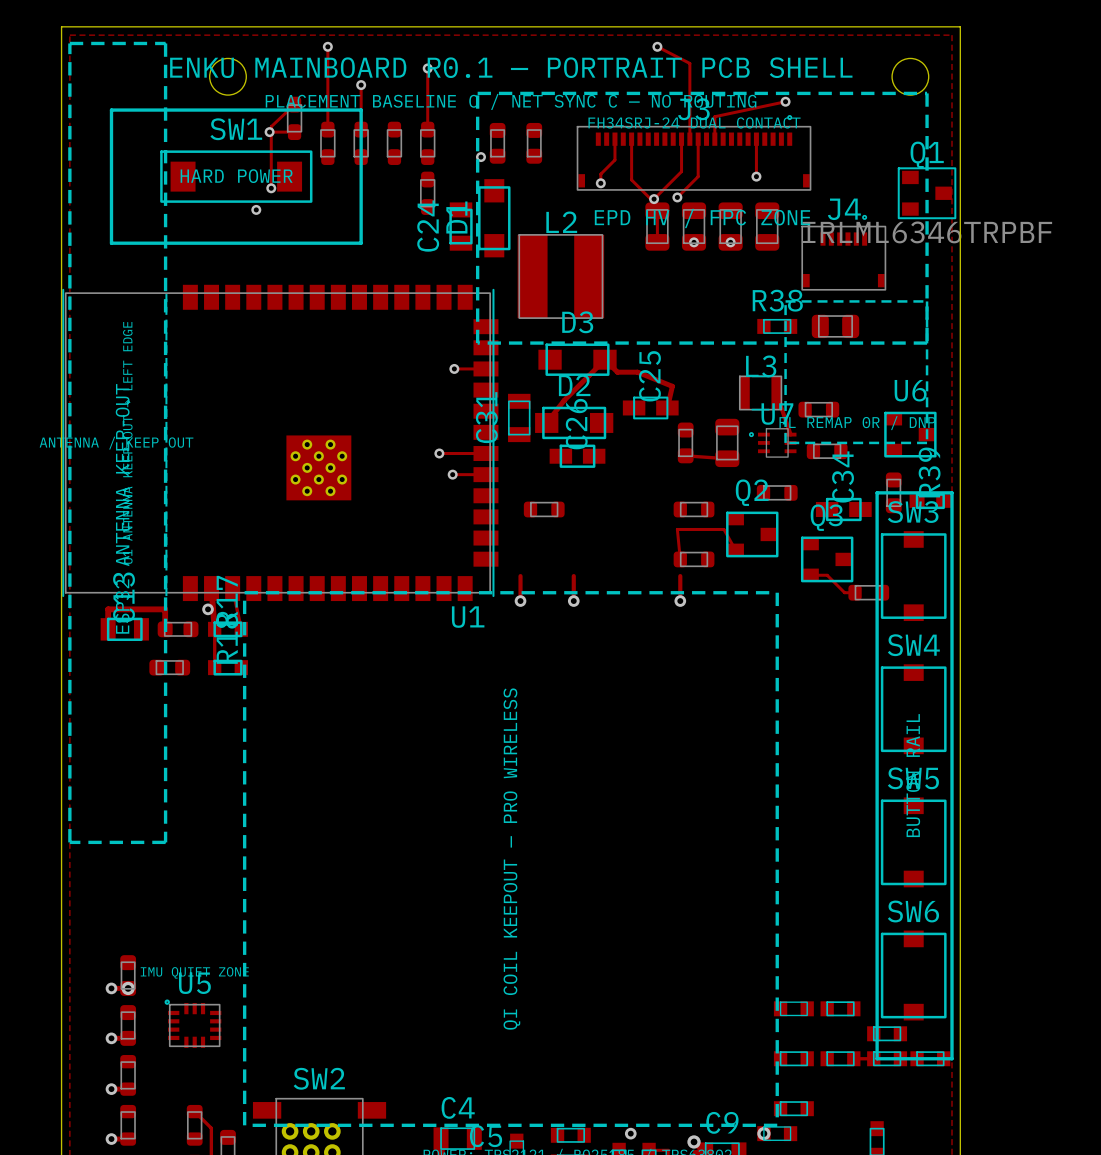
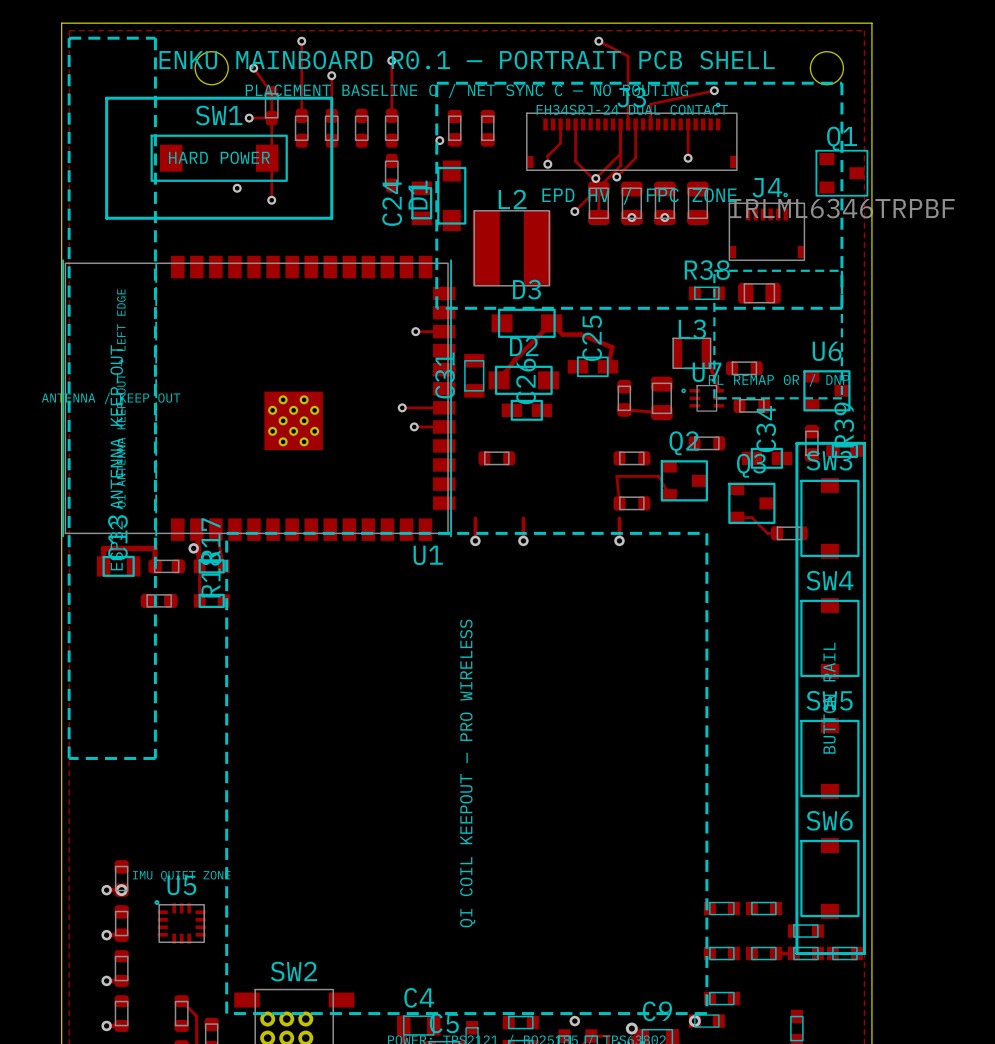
track: none -> (253, 68) (271, 93) (271, 200)
via: none -> (253, 68)
track: (294, 104) (271, 126) (271, 188) -> none
track: none -> (620, 153) (620, 165) (574, 211)
via: (271, 188) -> none
via position: (654, 199) -> (574, 211)
via: none -> (271, 200)

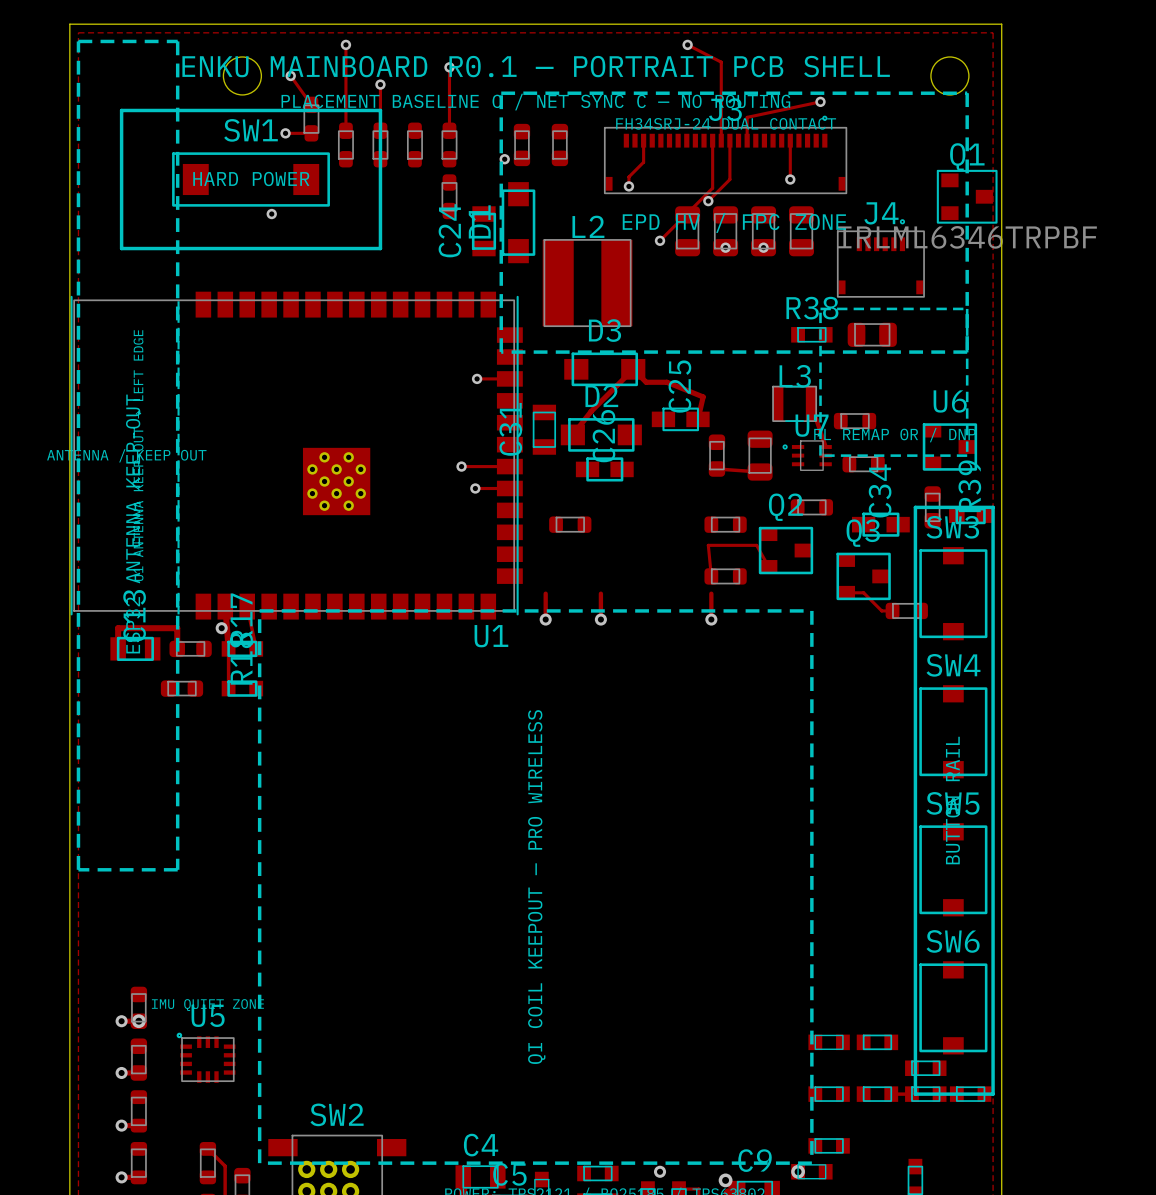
track: (271, 93) (271, 200) -> none
track: (575, 124) (575, 161) (598, 184) (598, 217) -> none
track: (620, 153) (595, 178) -> none
via: (595, 178) -> none
via: (271, 200) -> none

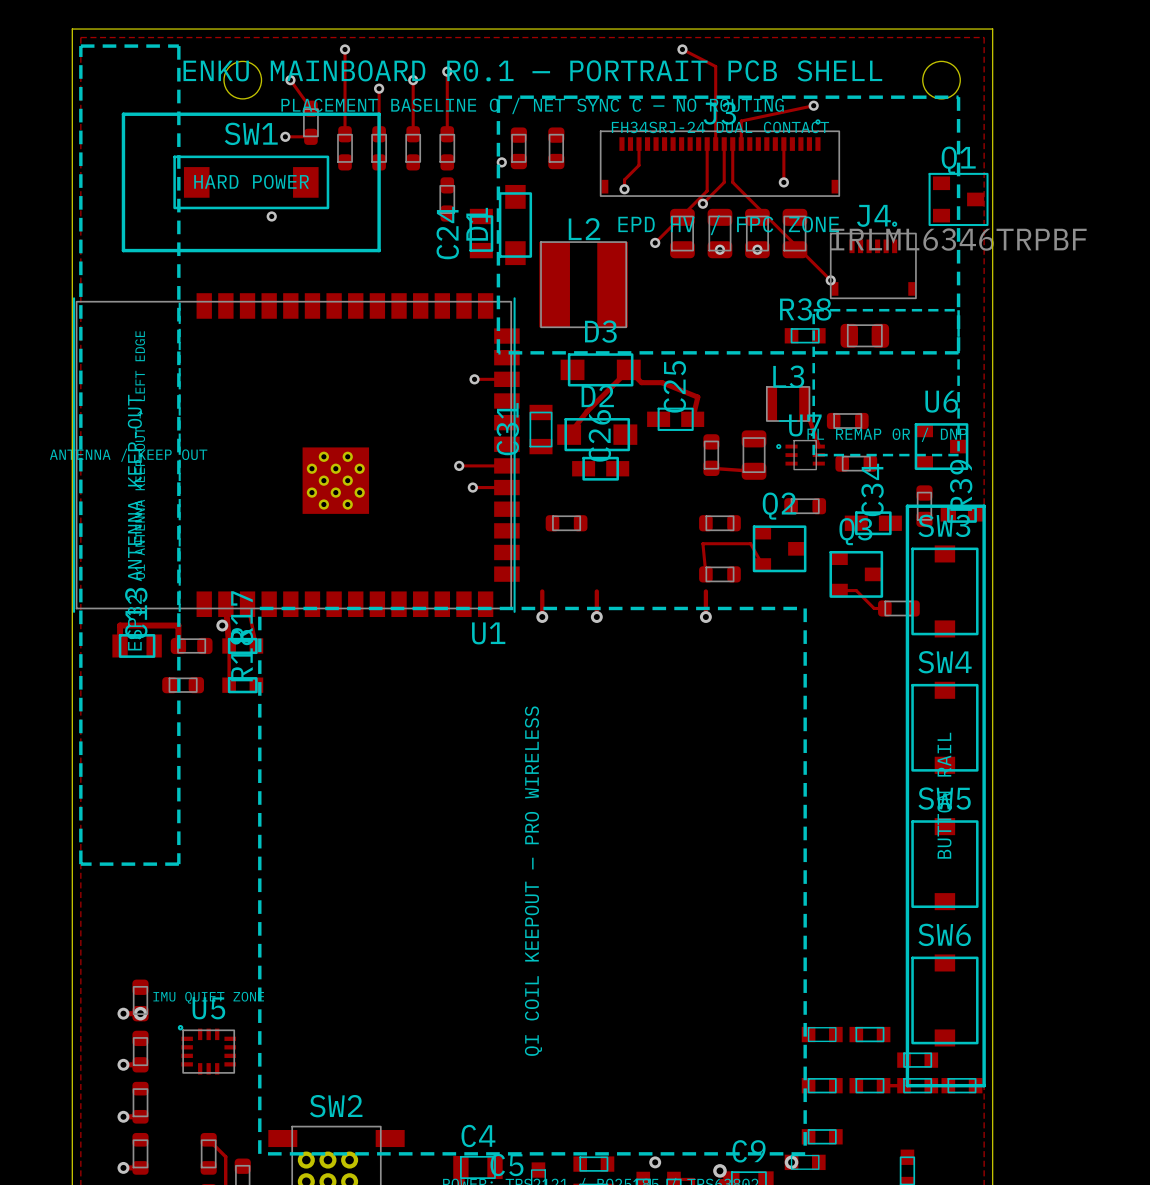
track: none -> (413, 80) (413, 134)
via: none -> (413, 80)
track: none -> (732, 144) (732, 182) (830, 280)
via: none -> (830, 280)

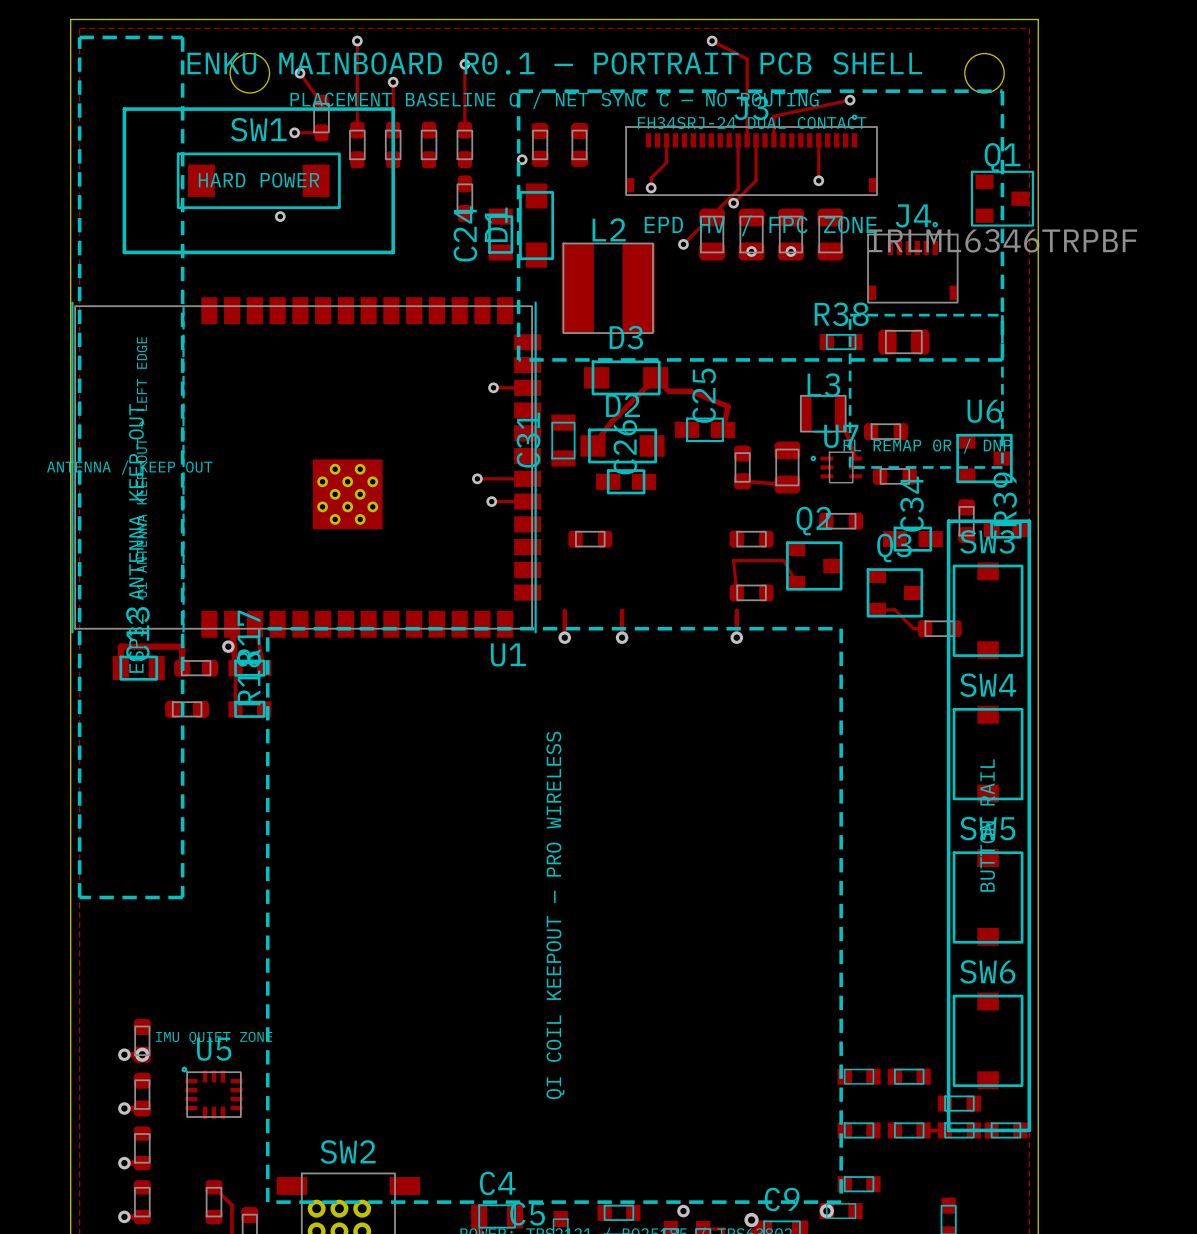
track: (413, 80) (413, 134) -> none
via: (413, 80) -> none
track: (732, 144) (732, 182) (830, 280) -> none
via: (830, 280) -> none

